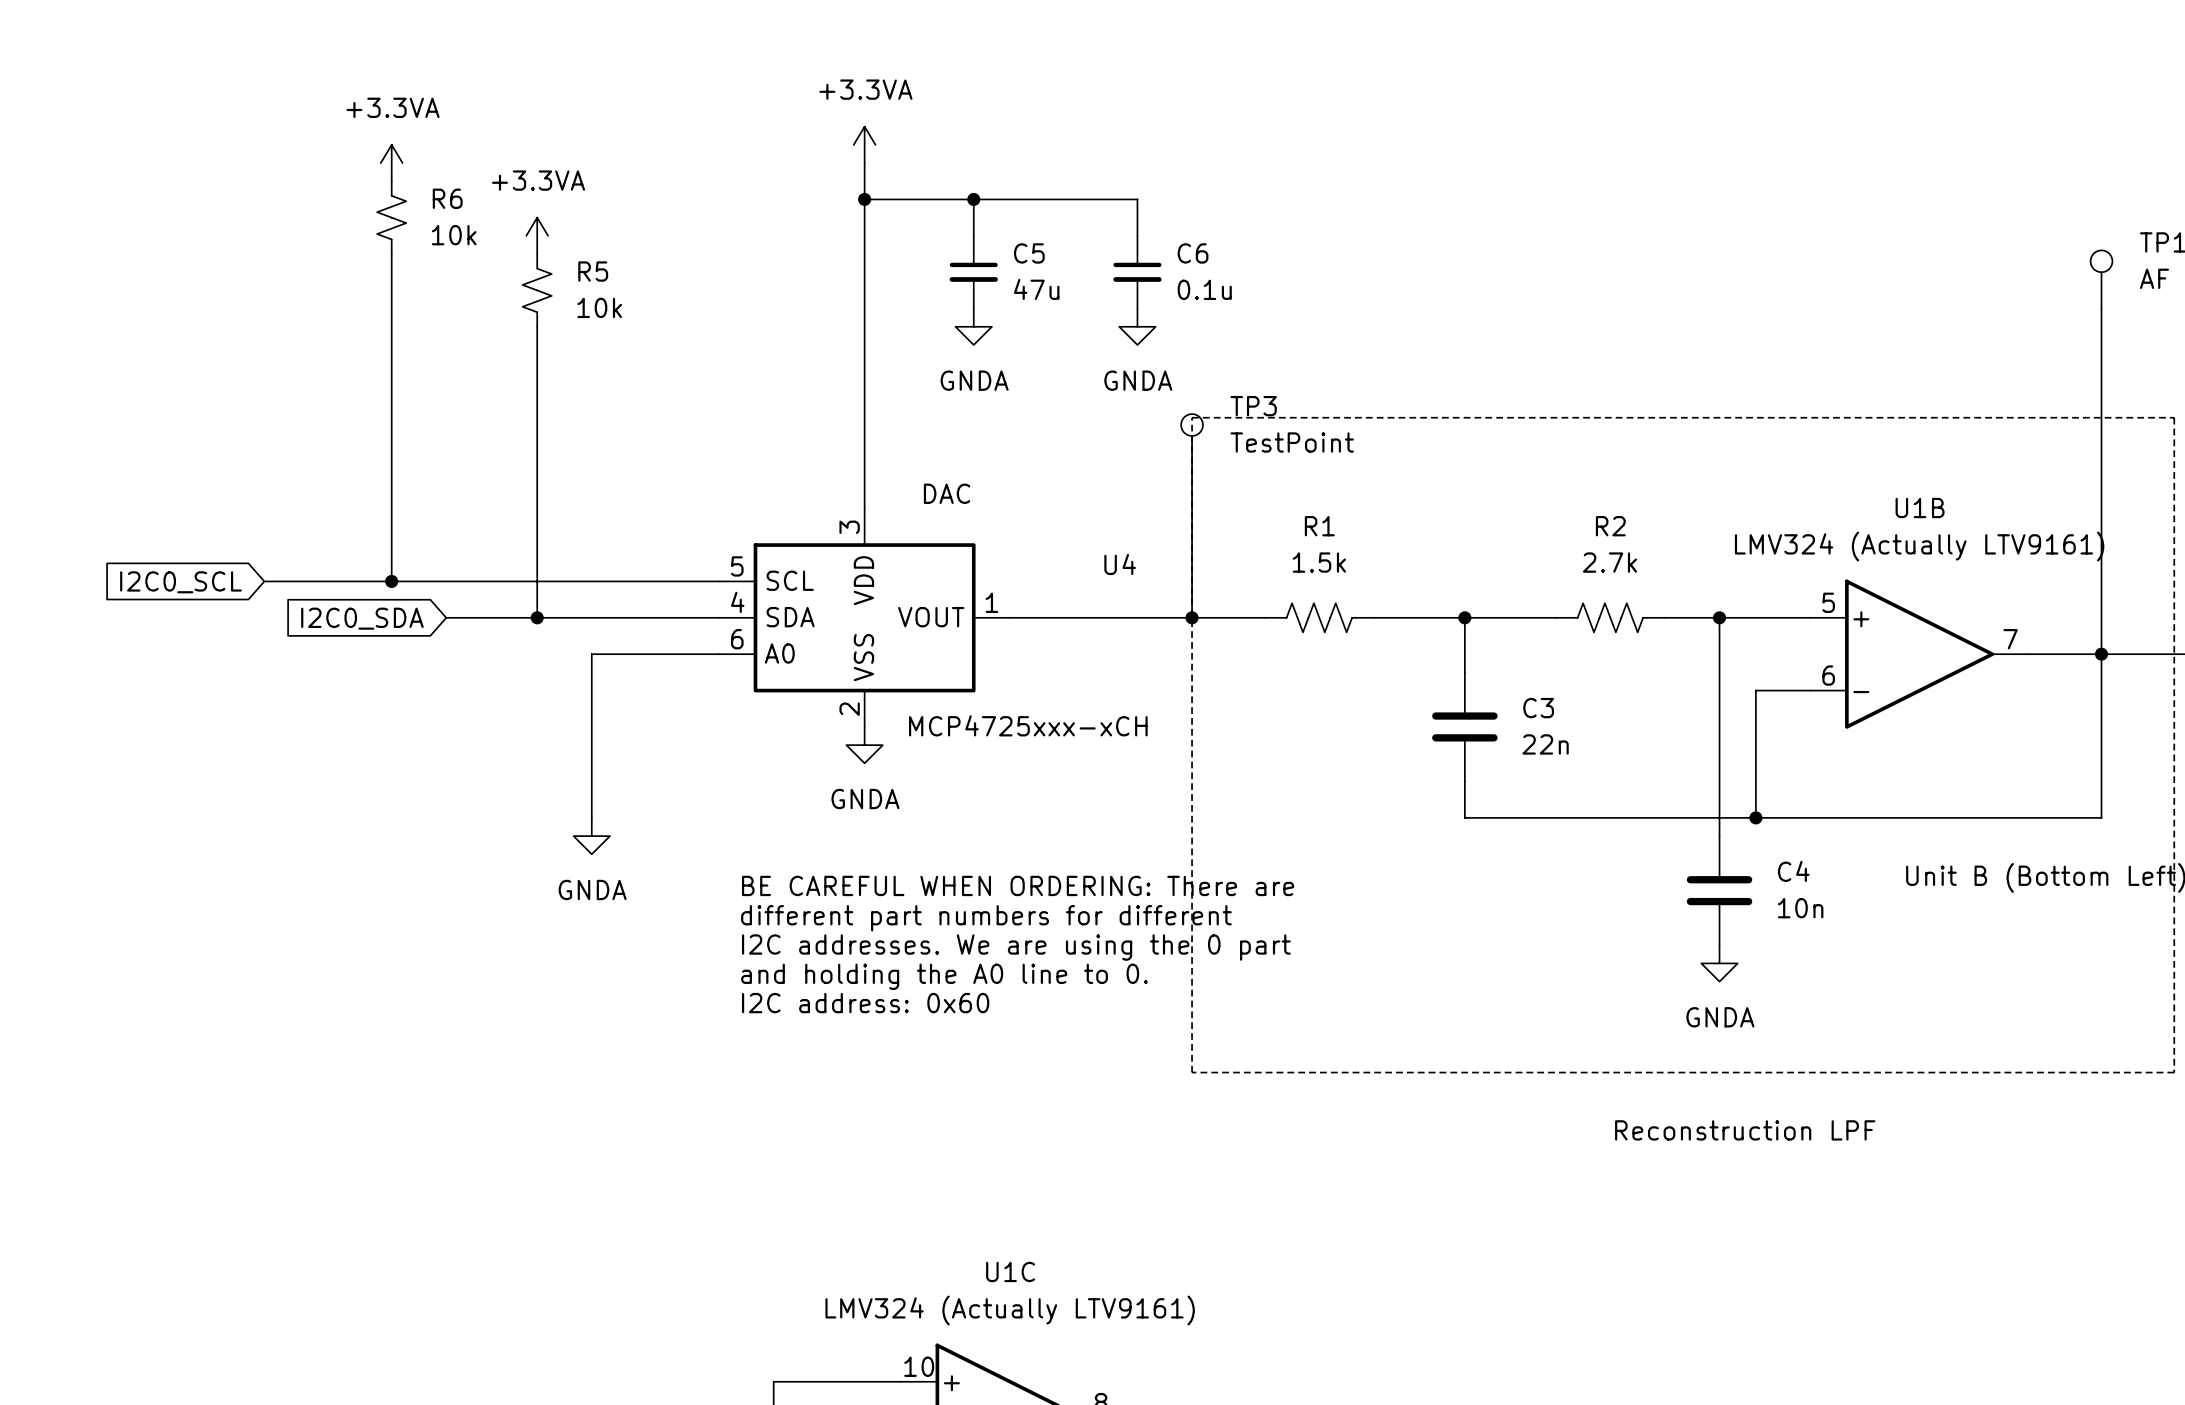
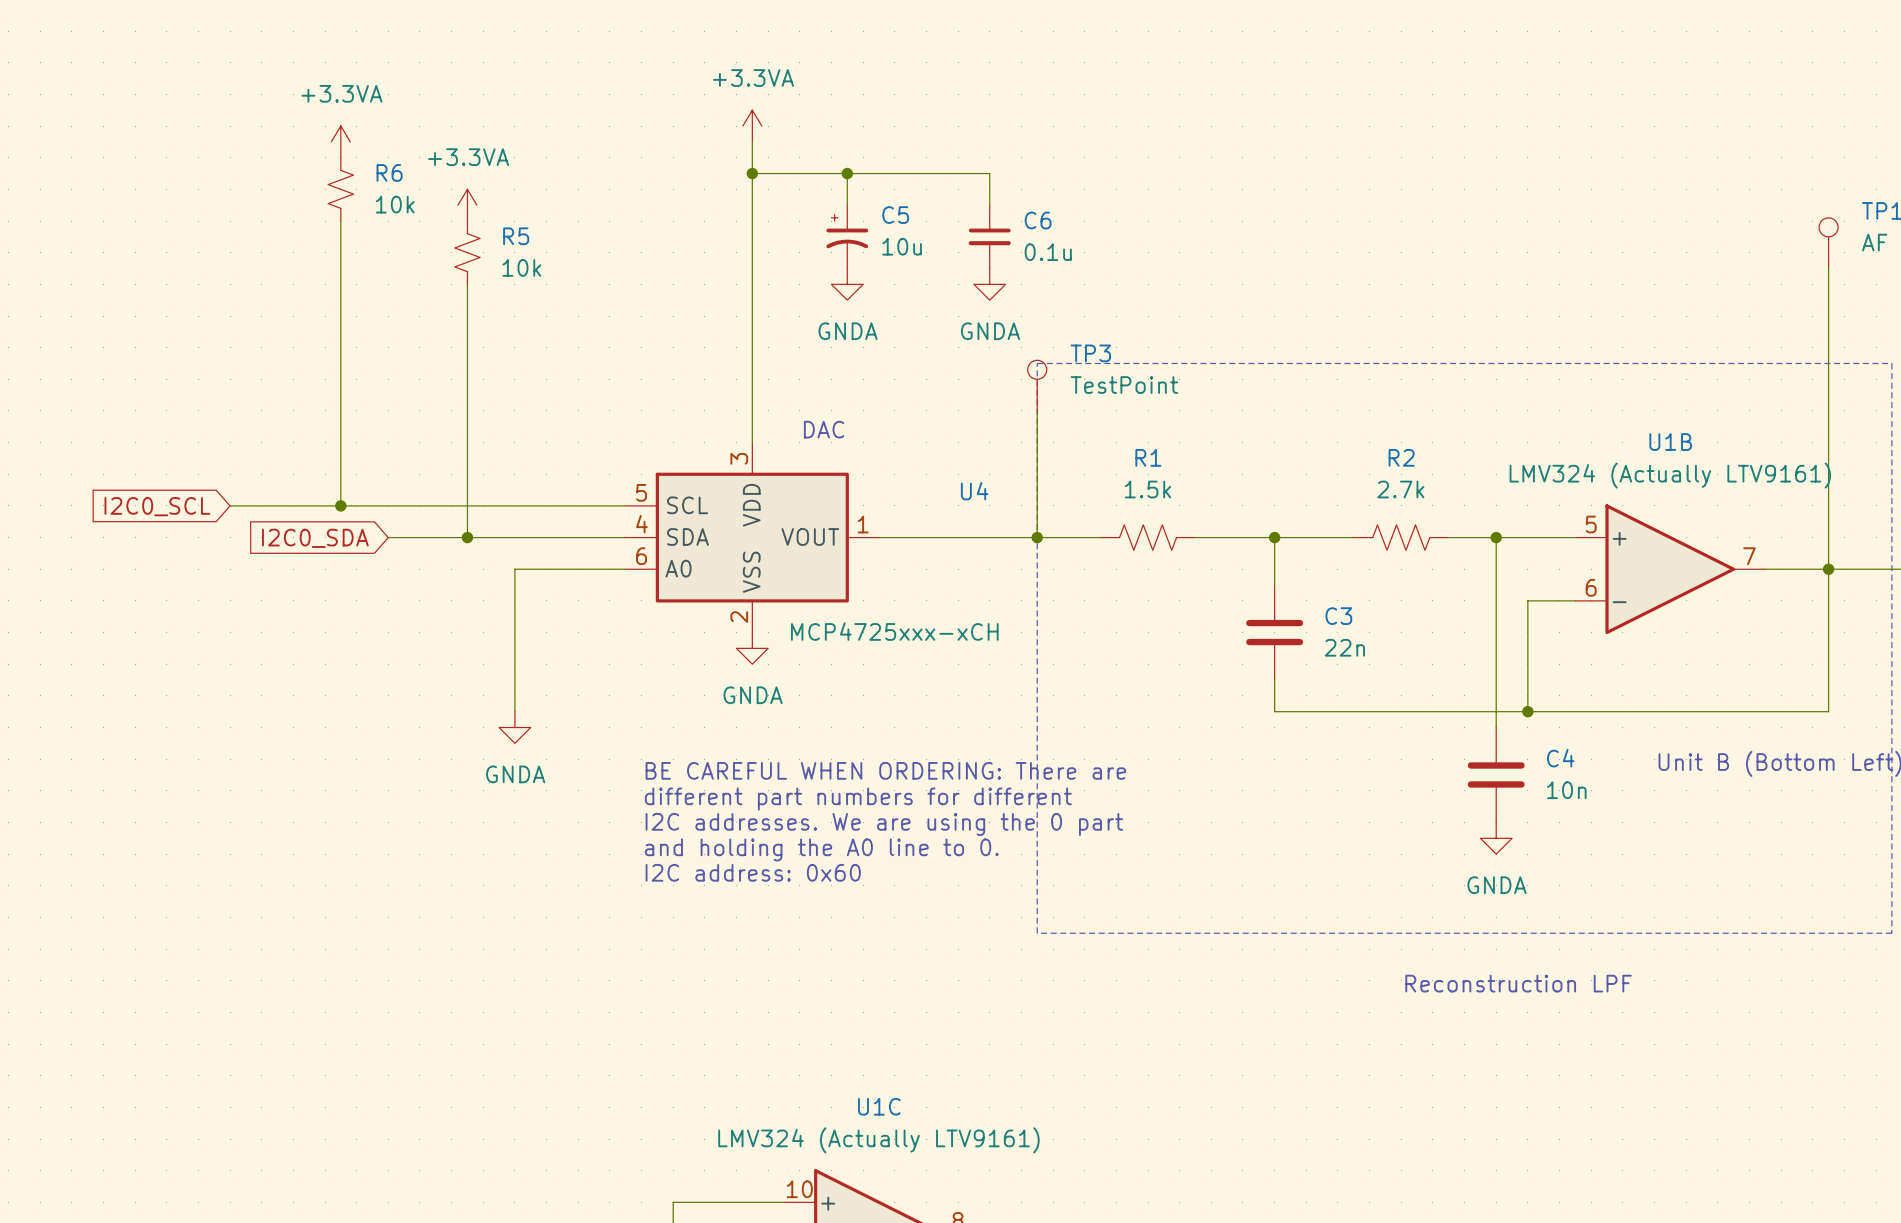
C5 symbol: [949, 235, 998, 309] -> [826, 205, 869, 269]
C5 value: 47u (1036, 289) -> 10u (902, 246)

